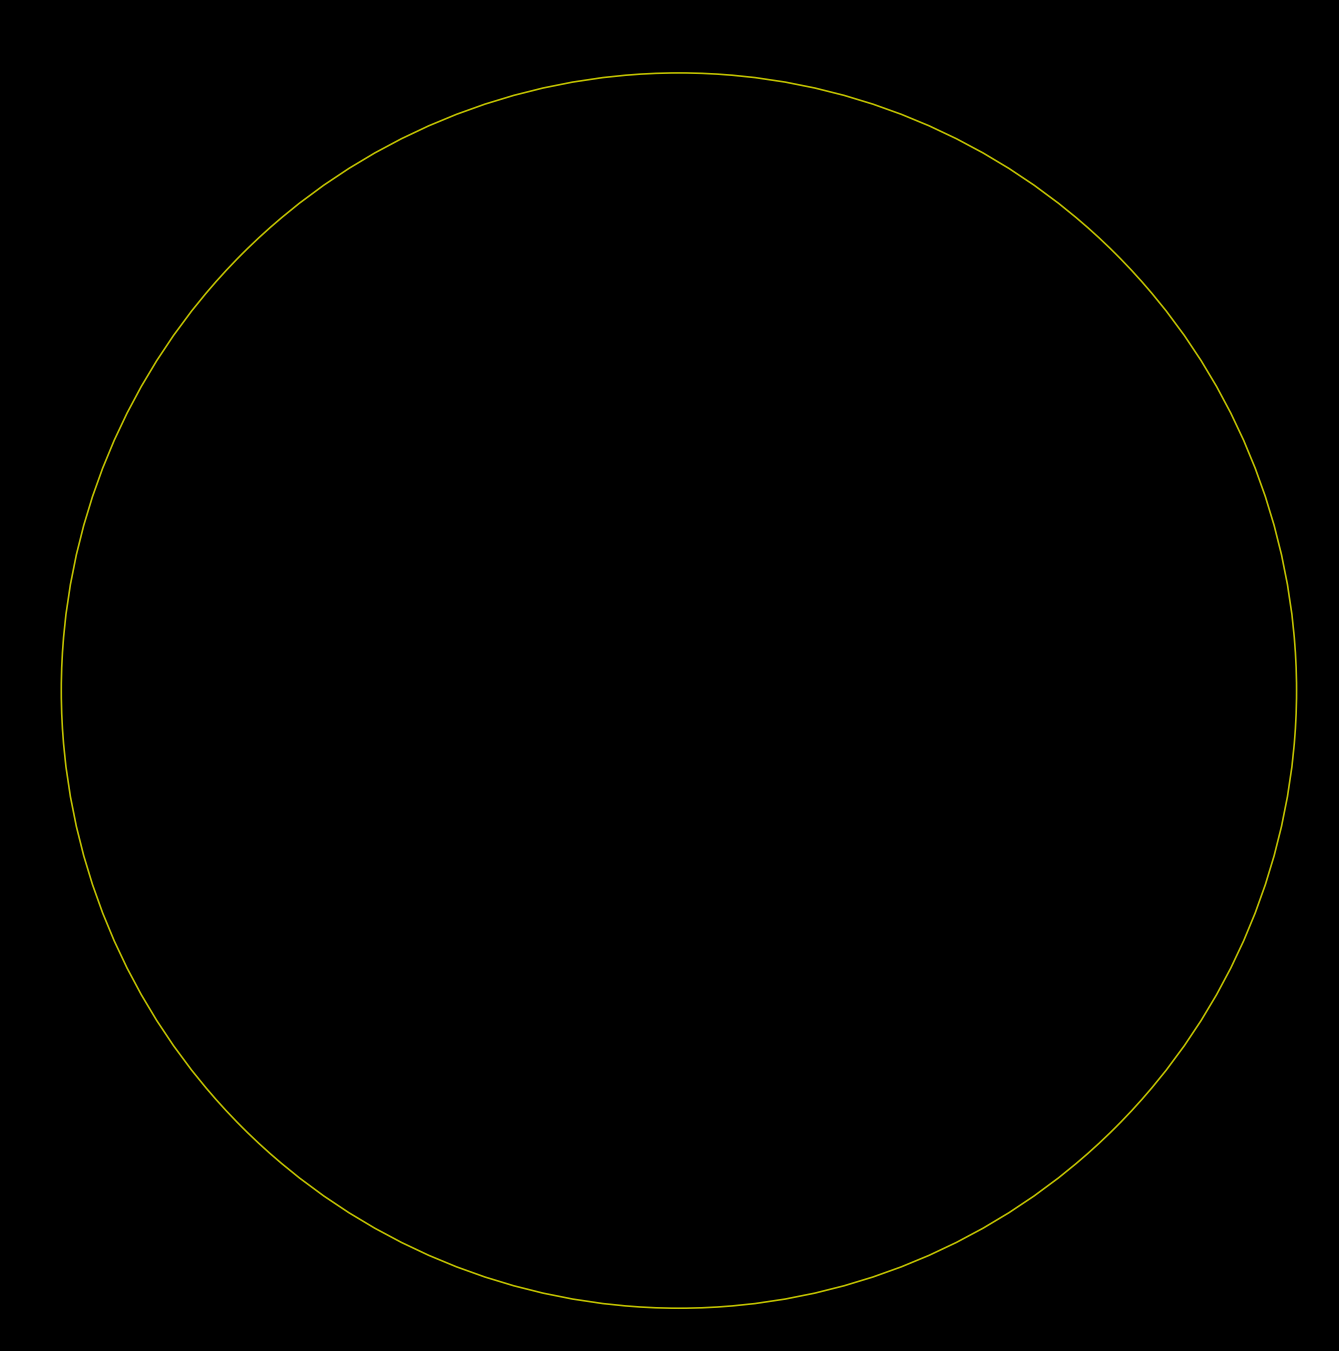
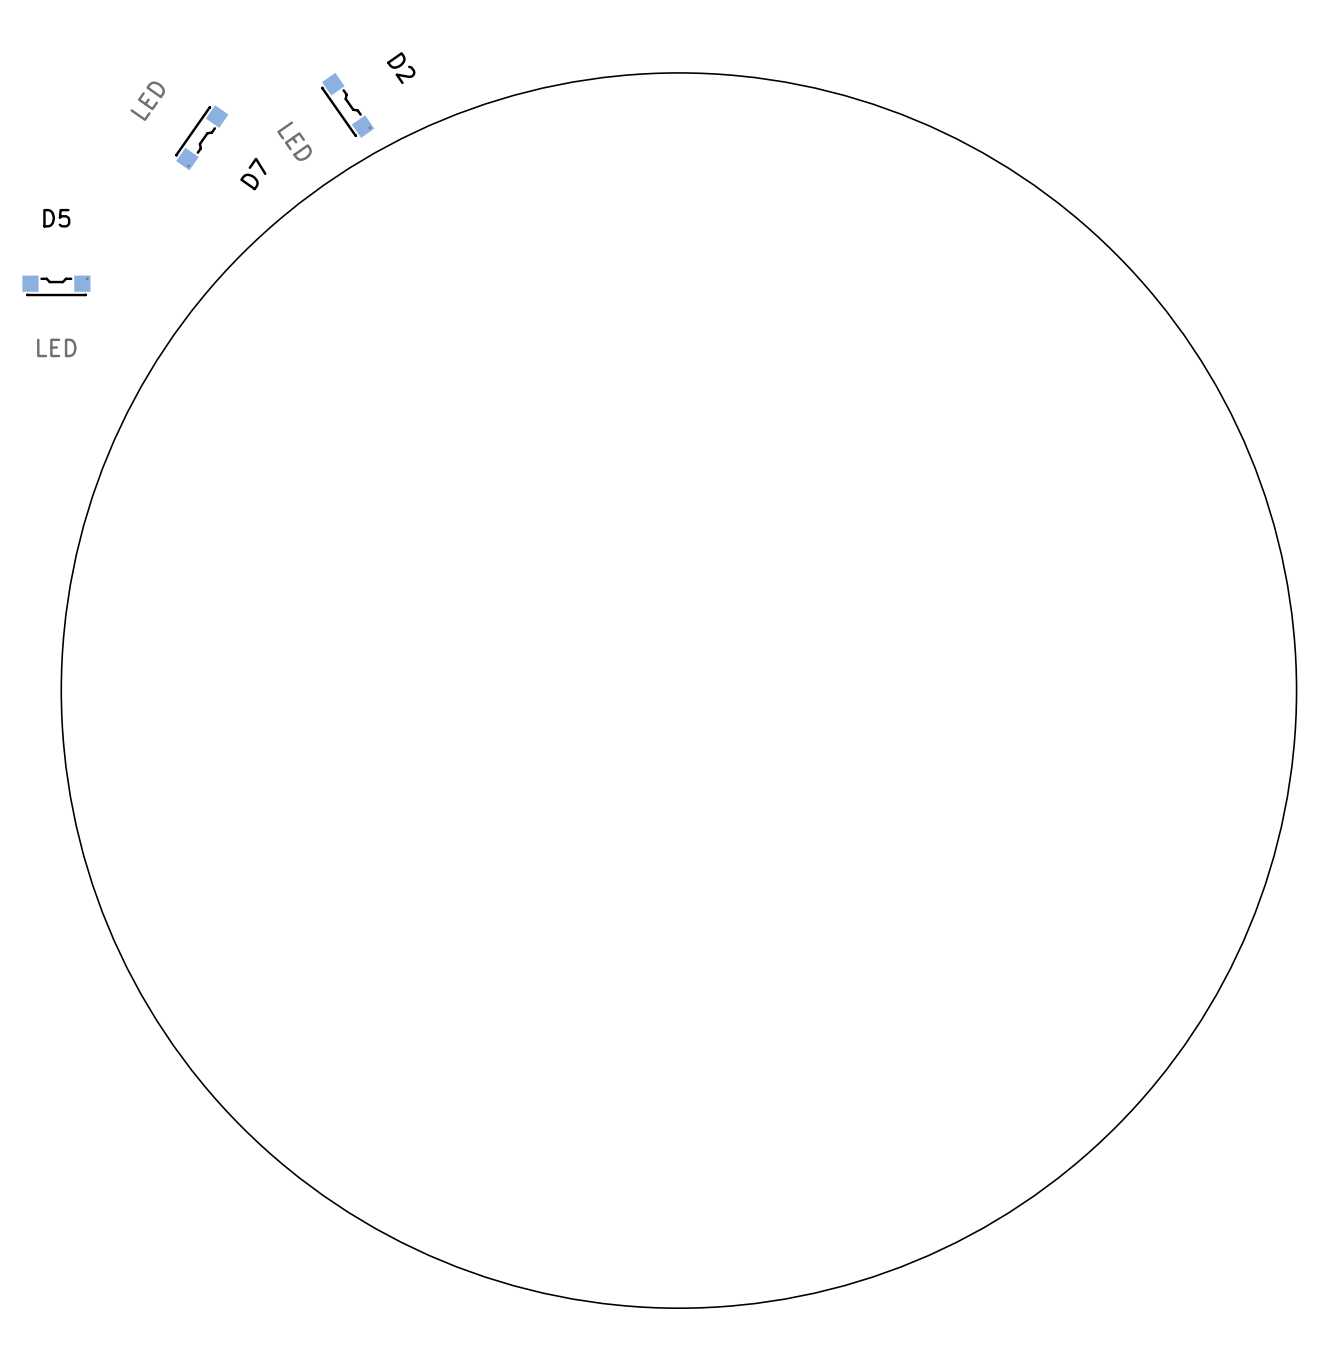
D2: none -> LED (347, 105)
D7: none -> LED (201, 137)
D5: none -> LED (56, 285)

